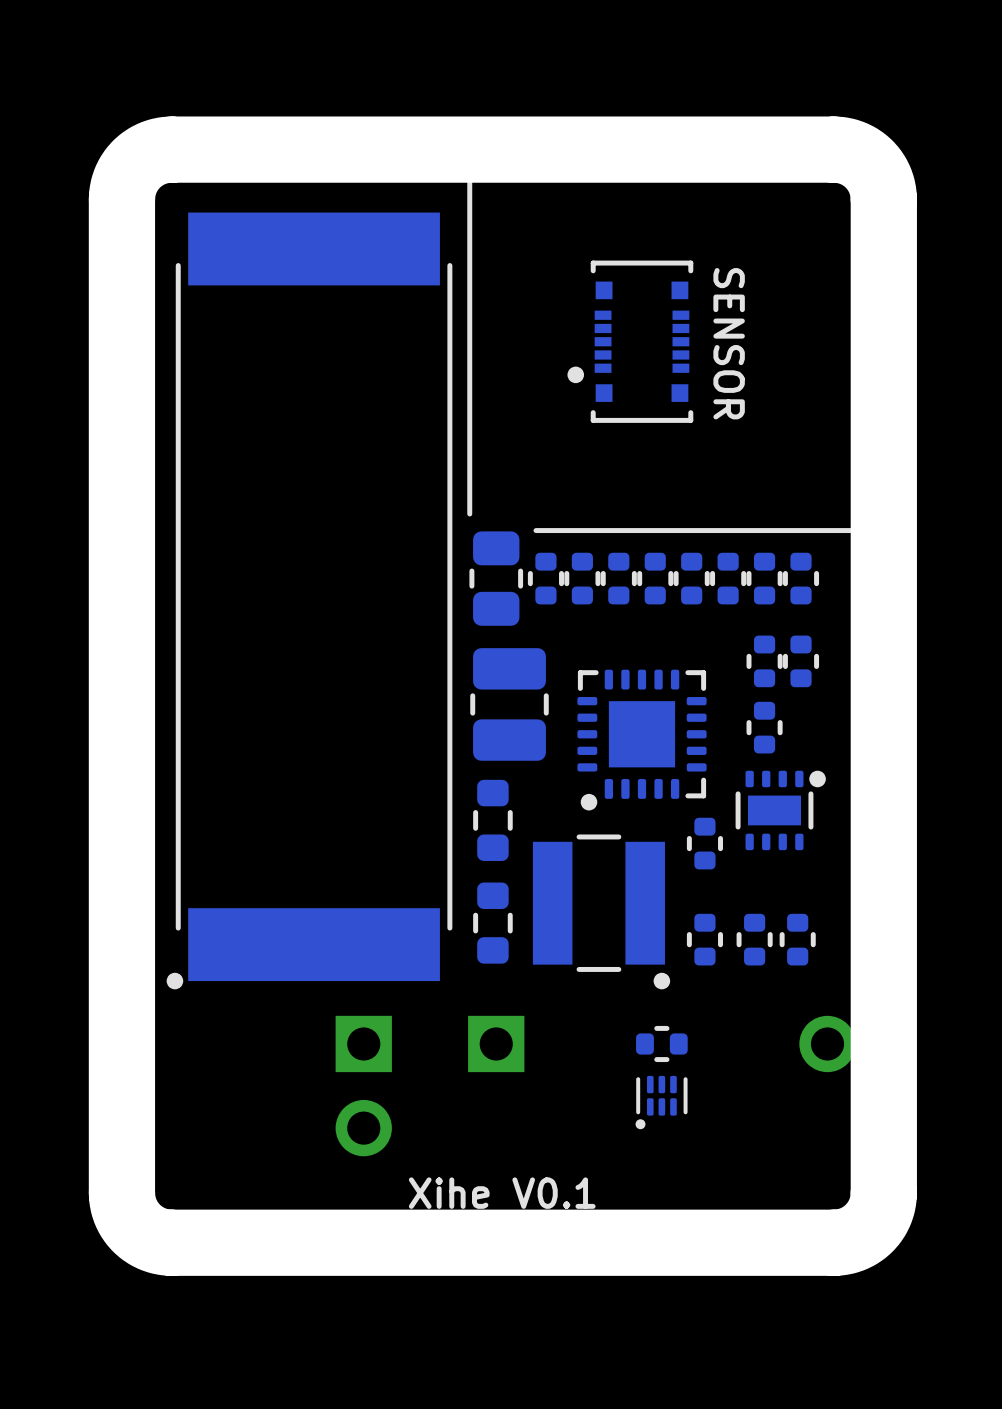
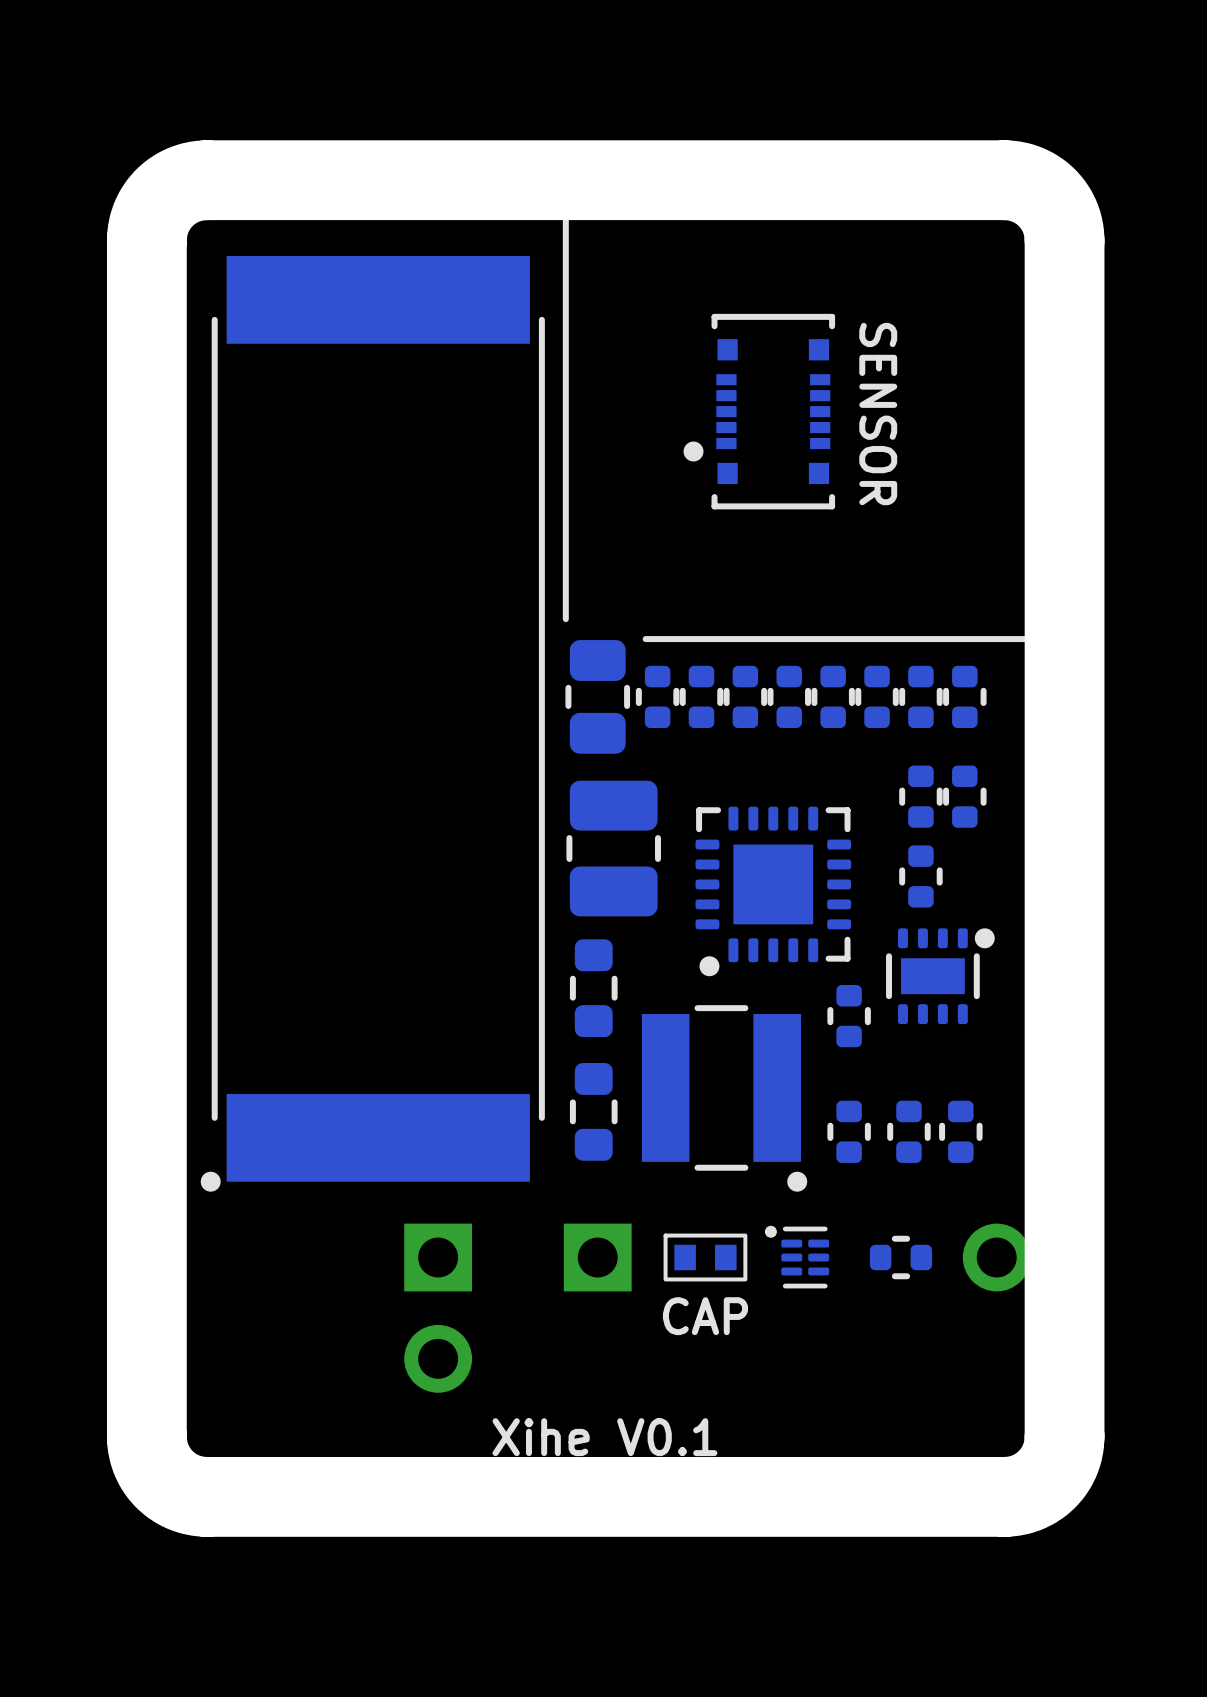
part footprint: [636, 1025, 688, 1063] -> [764, 1225, 830, 1289]
part: none -> (705, 1257)
part: none -> (900, 1257)
part: (661, 1102) -> none

